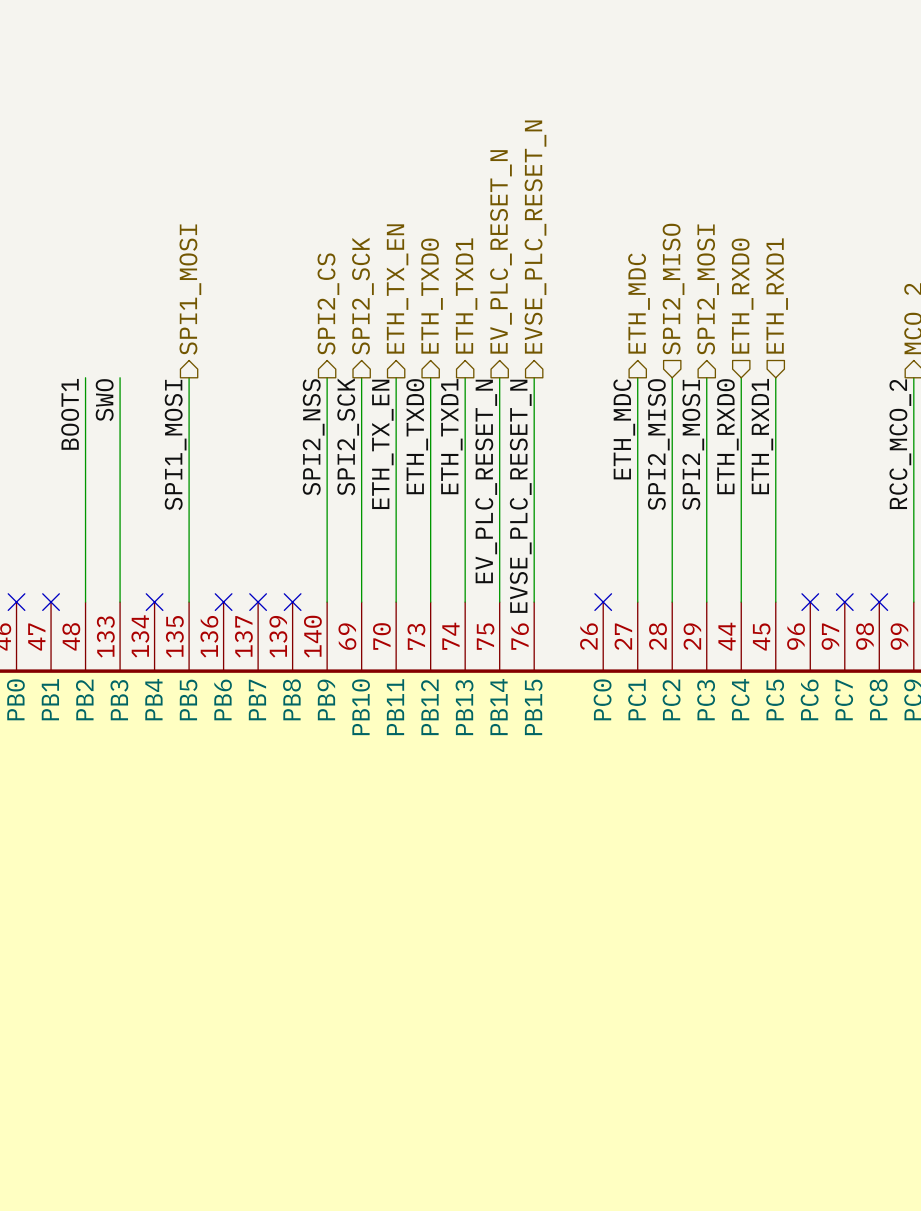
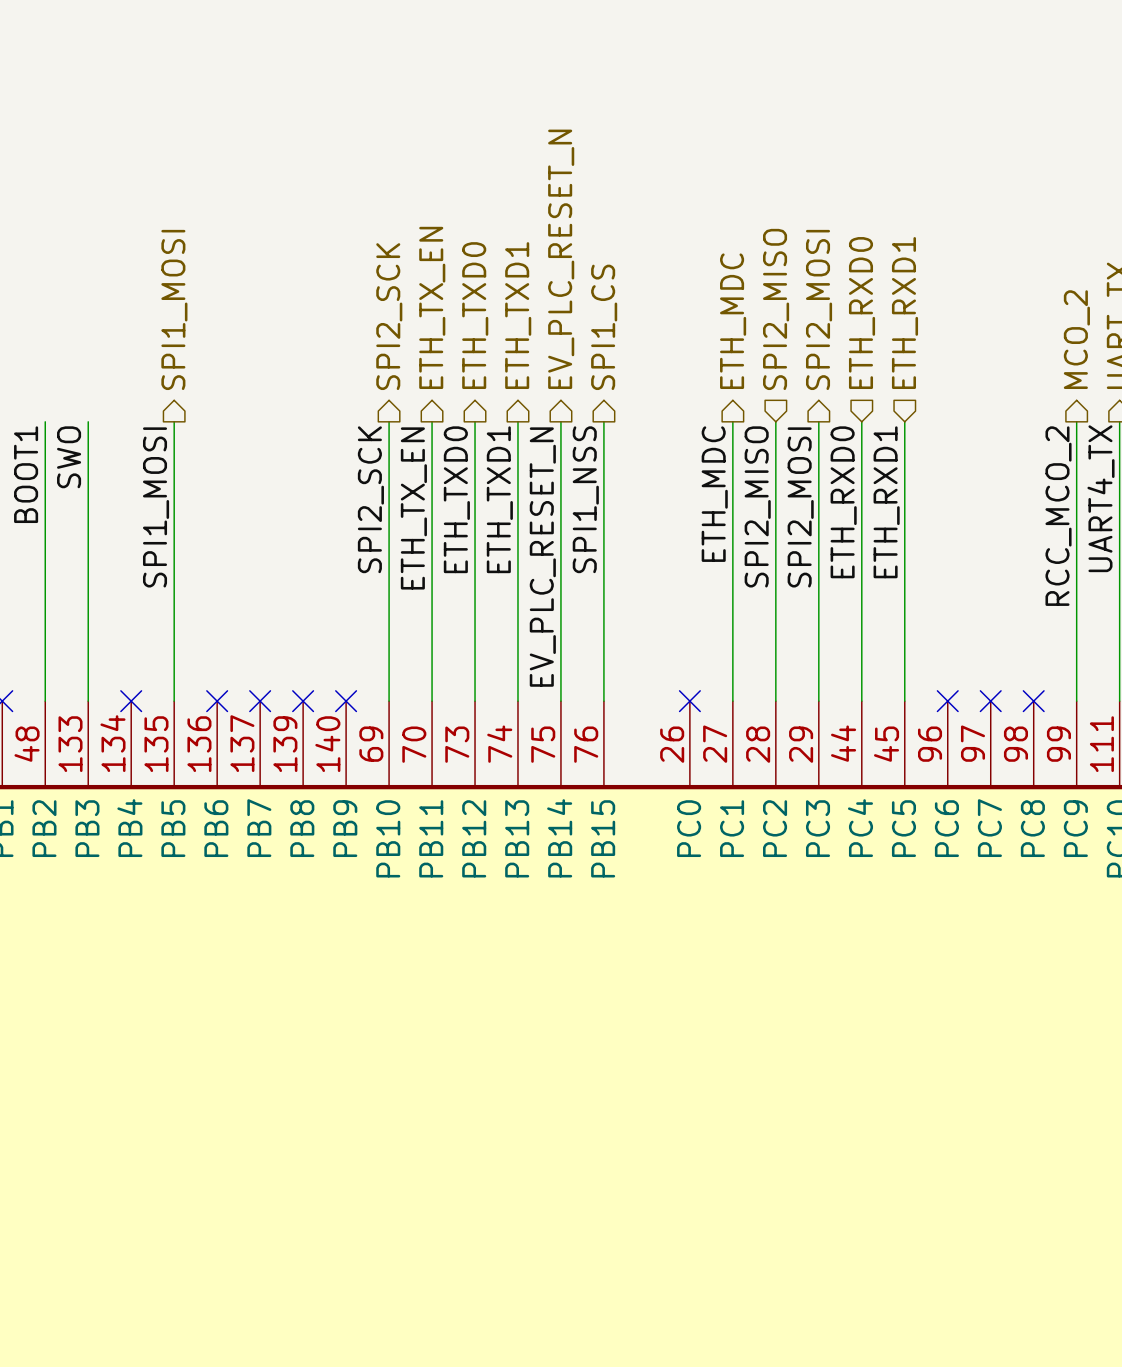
hierarchical label: EVSE_PLC_RESET_N (535, 237) -> SPI1_CS (604, 327)
hierarchical label: SPI2_CS (328, 304) -> none
wire: (327, 377) (327, 602) -> none
label: SPI2_NSS (313, 437) -> none
label: EVSE_PLC_RESET_N (520, 496) -> SPI1_NSS (585, 499)
no-connect mark: none -> (346, 701)

